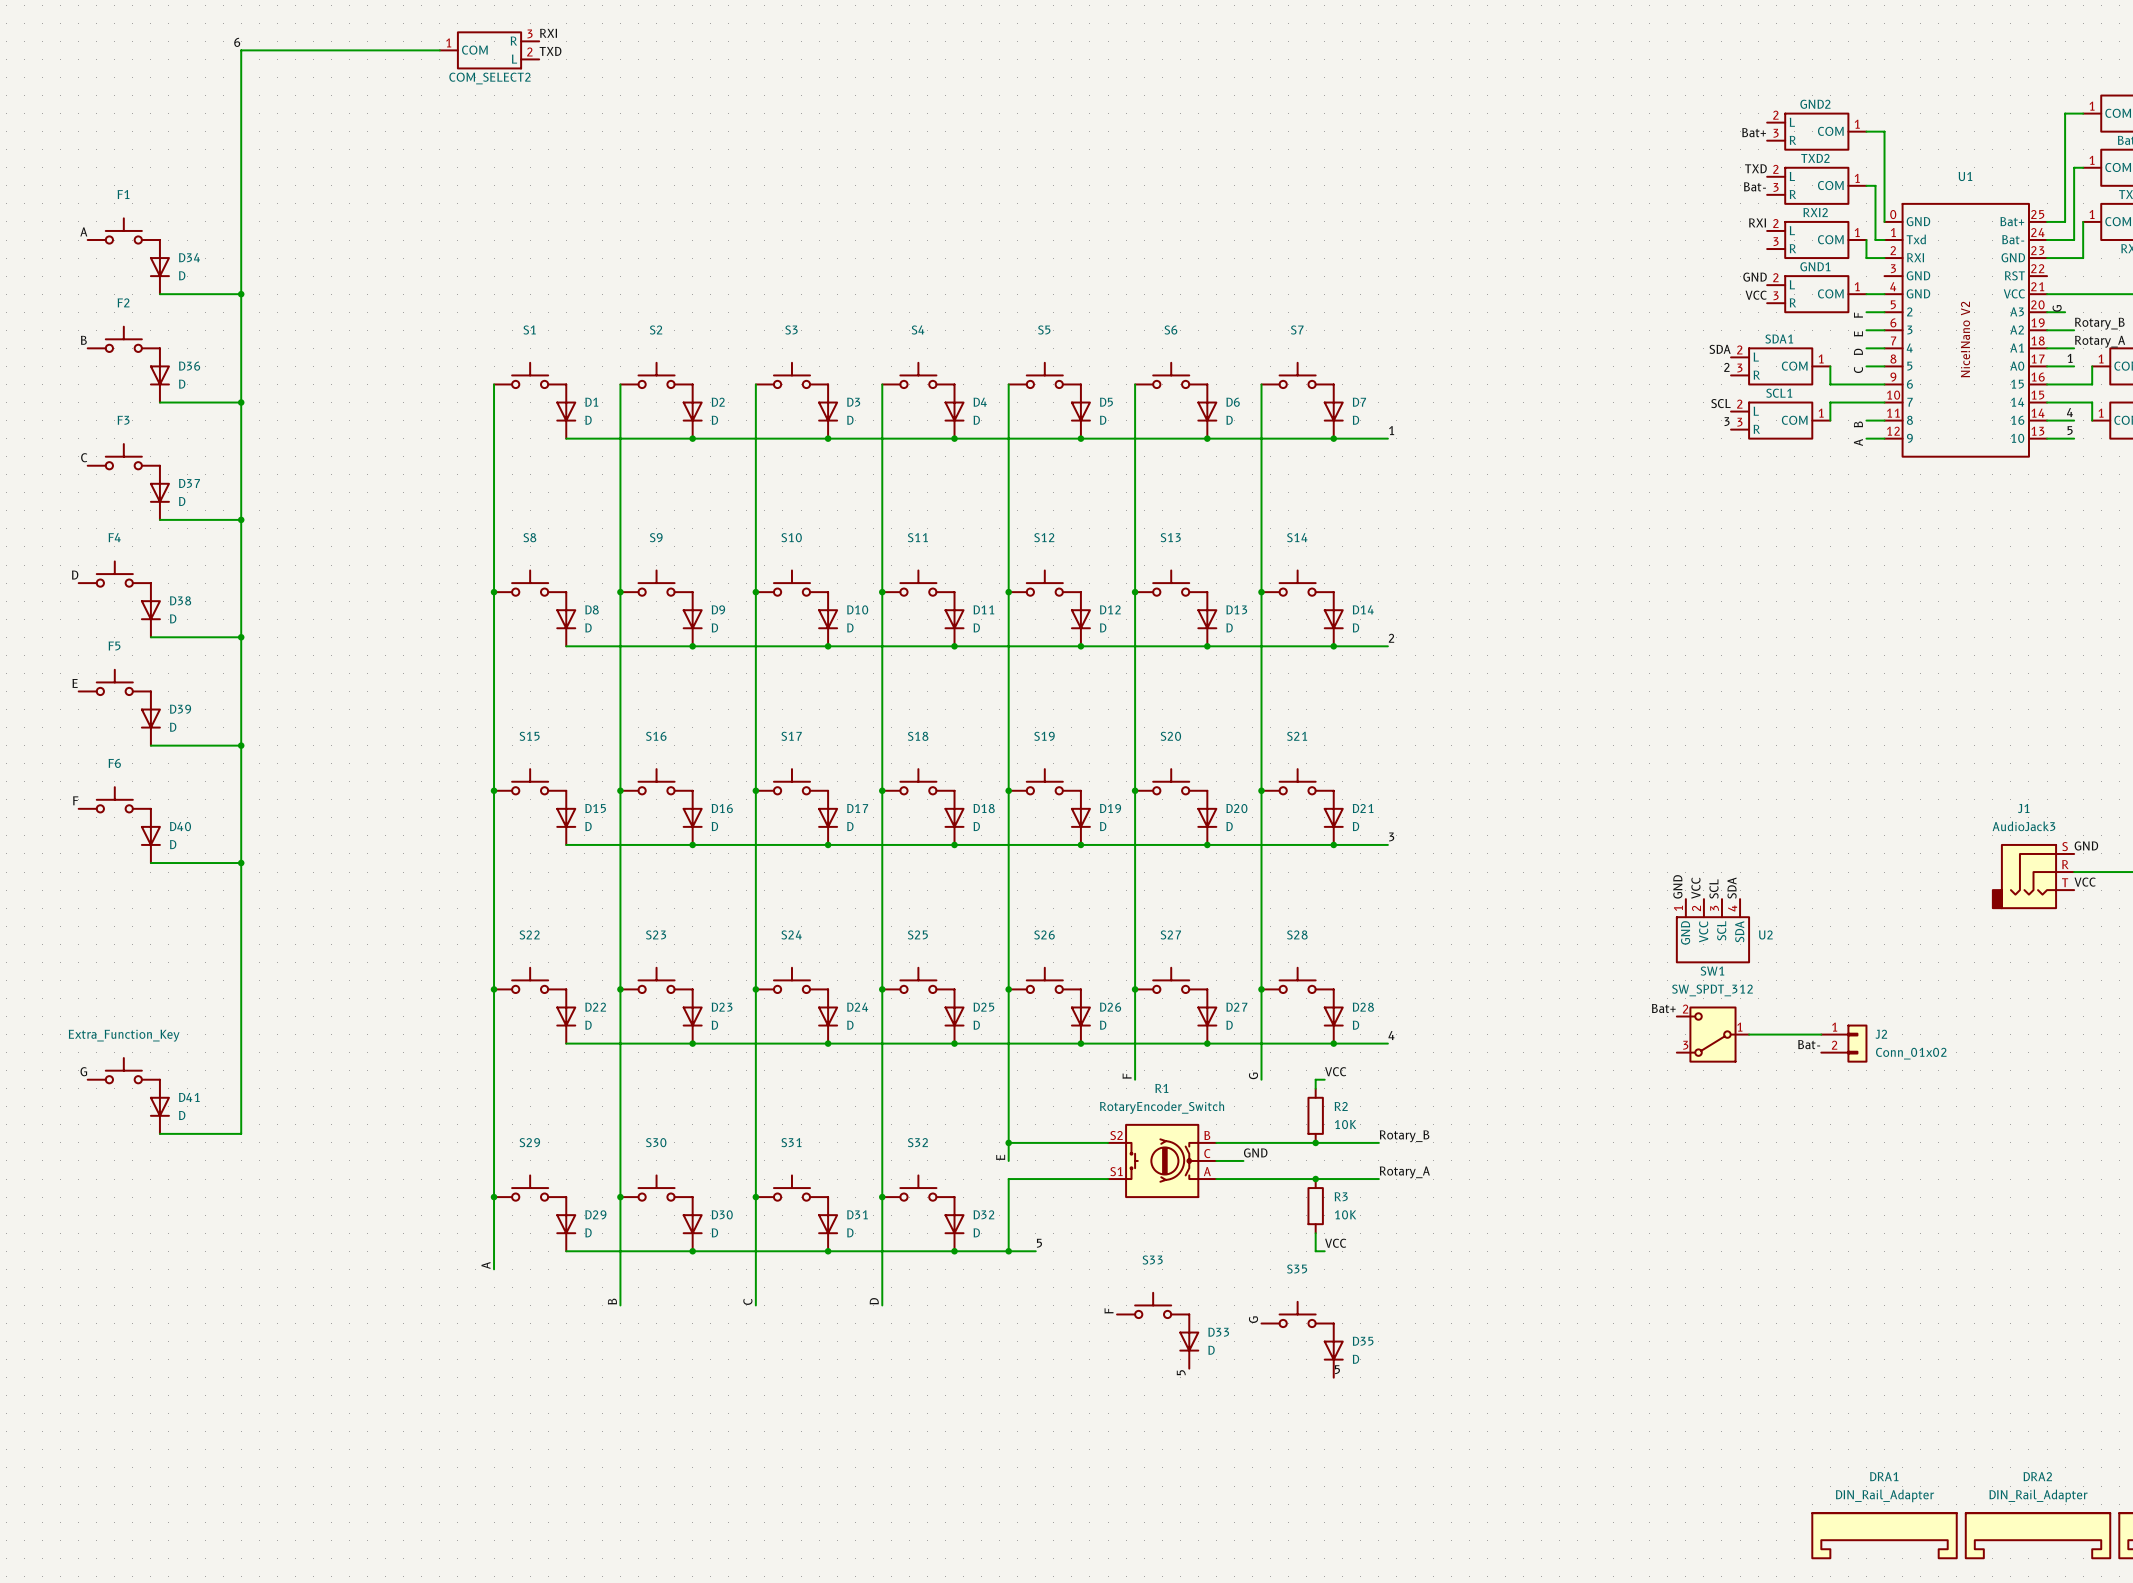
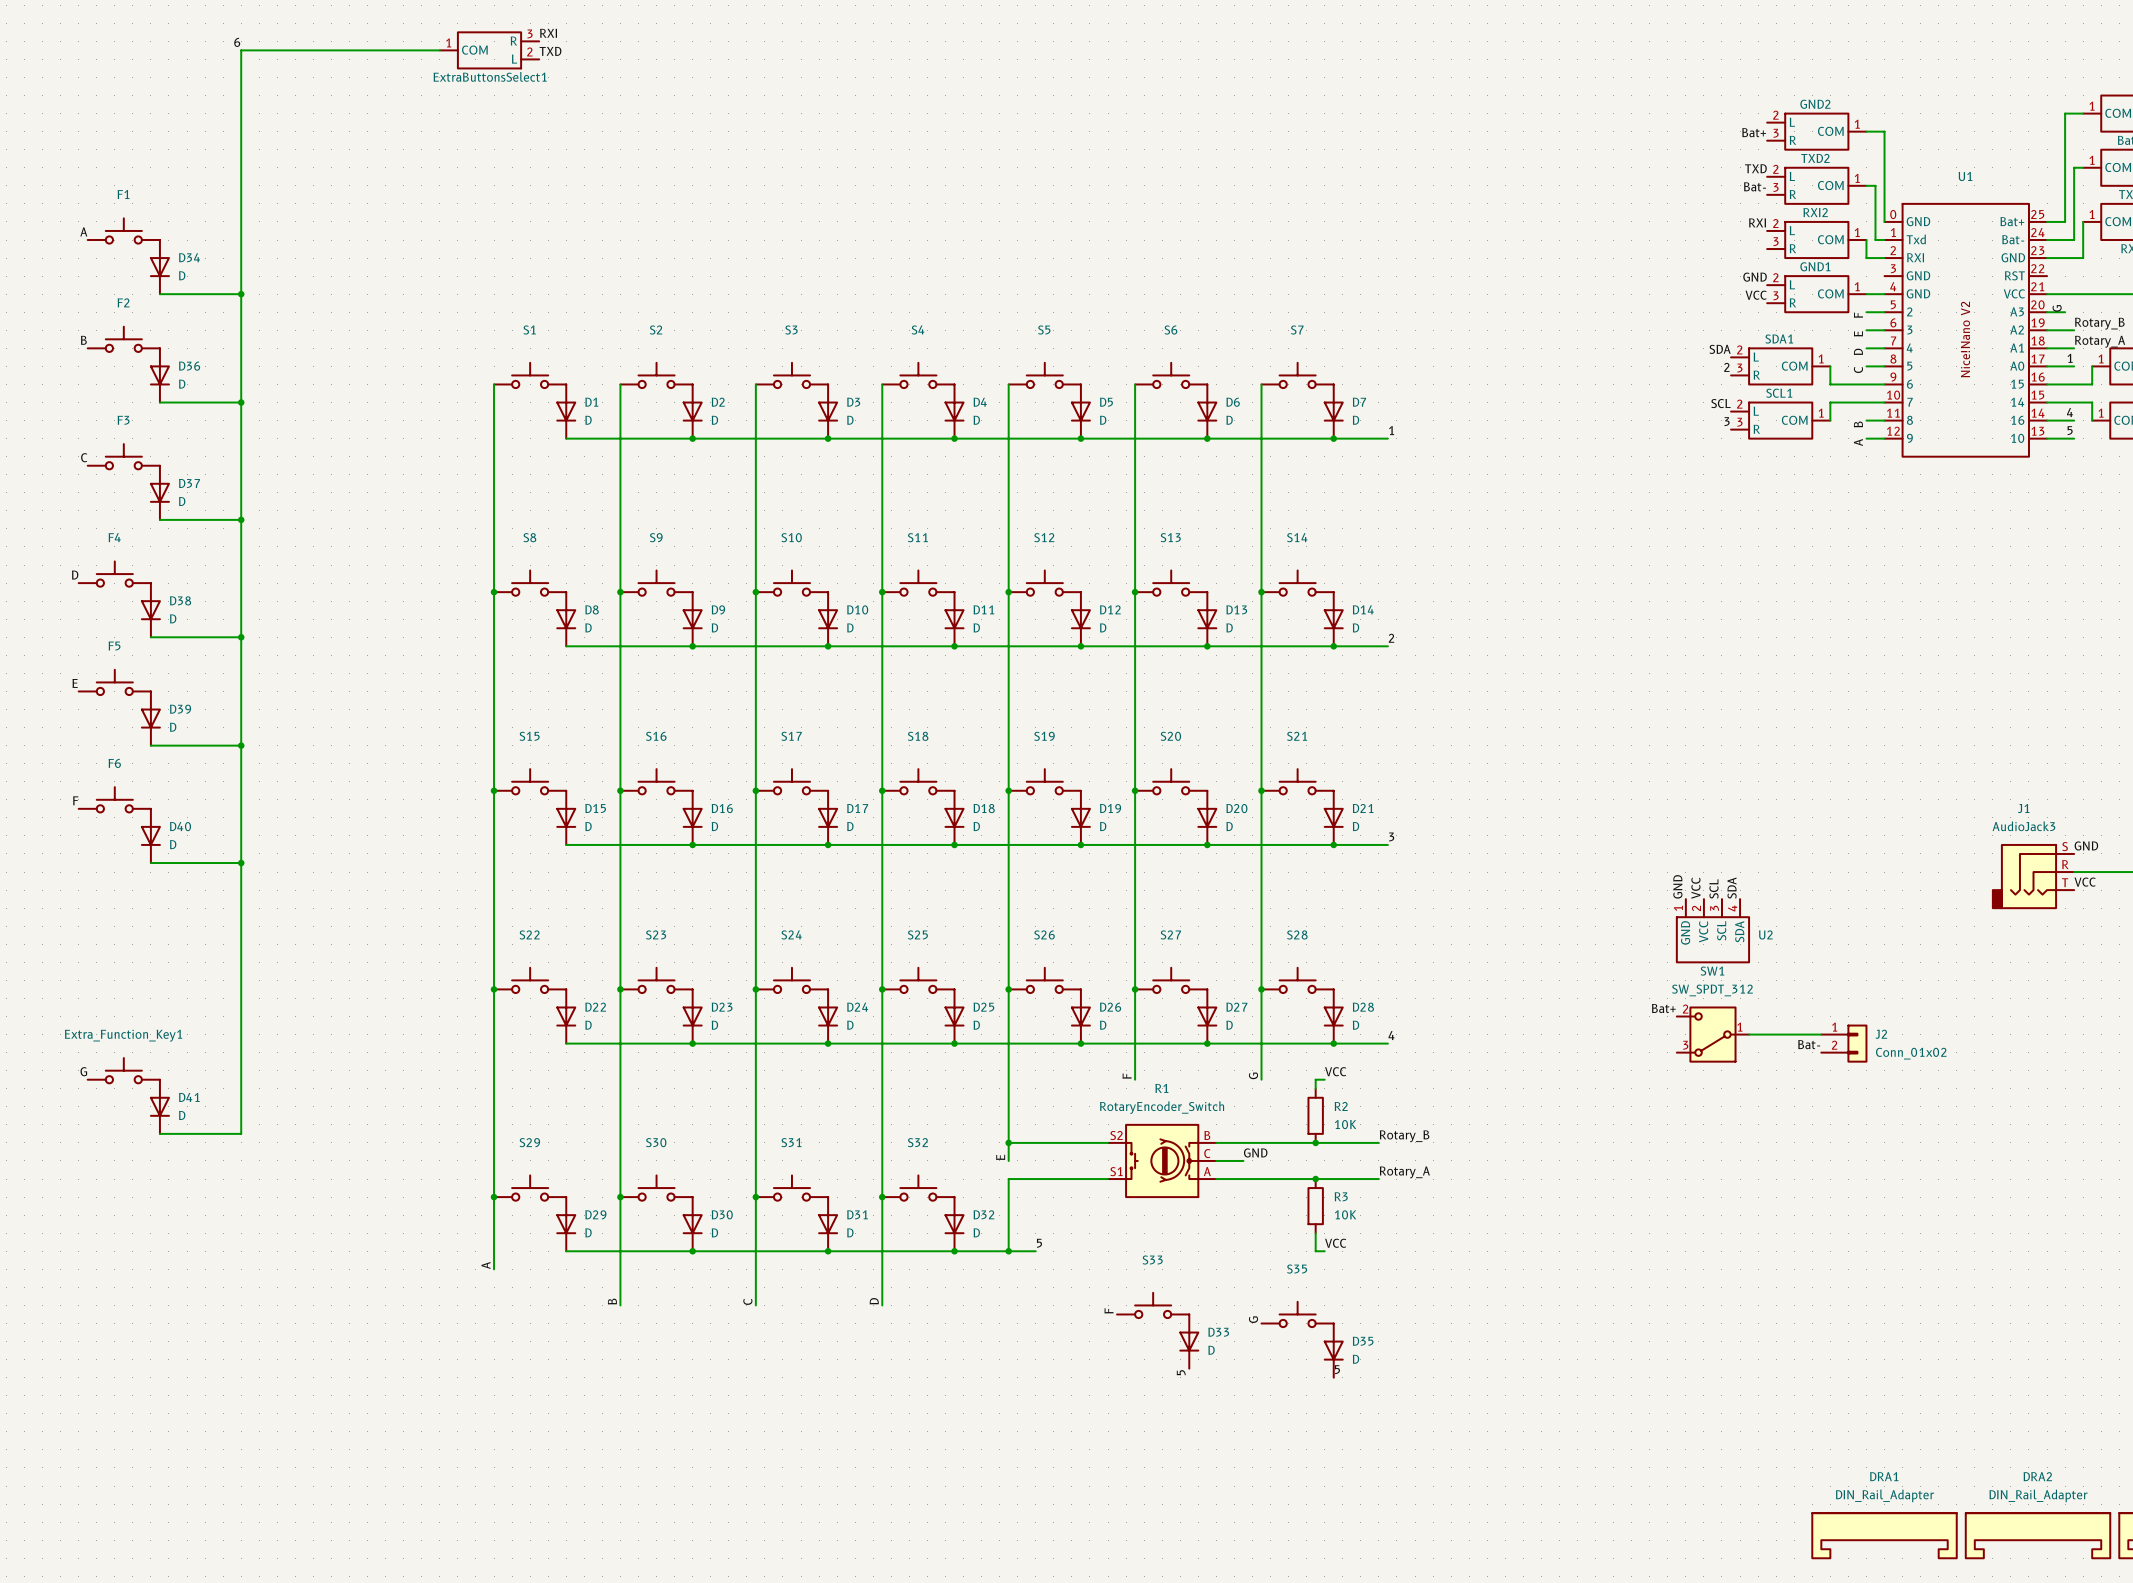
COM_SELECT2 name: COM_SELECT2 (489, 78) -> ExtraButtonsSelect1 (490, 76)
Extra_Function_Key name: Extra_Function_Key (124, 1035) -> Extra_Function_Key1 (123, 1035)

